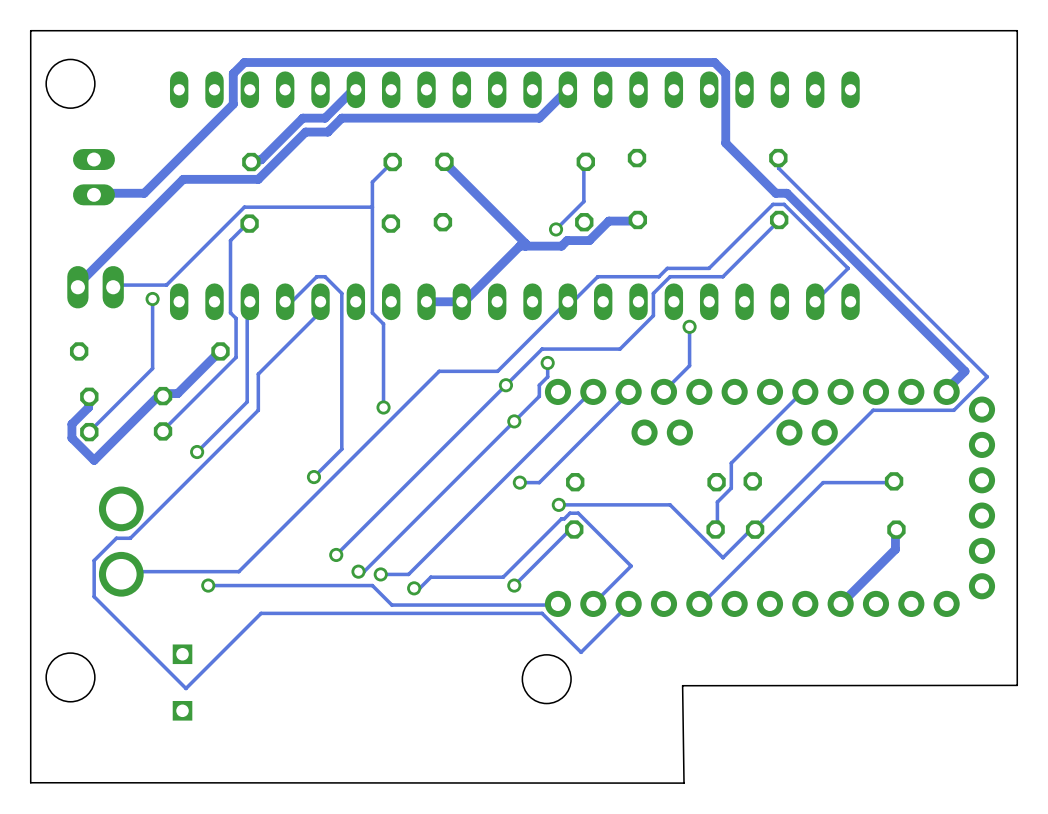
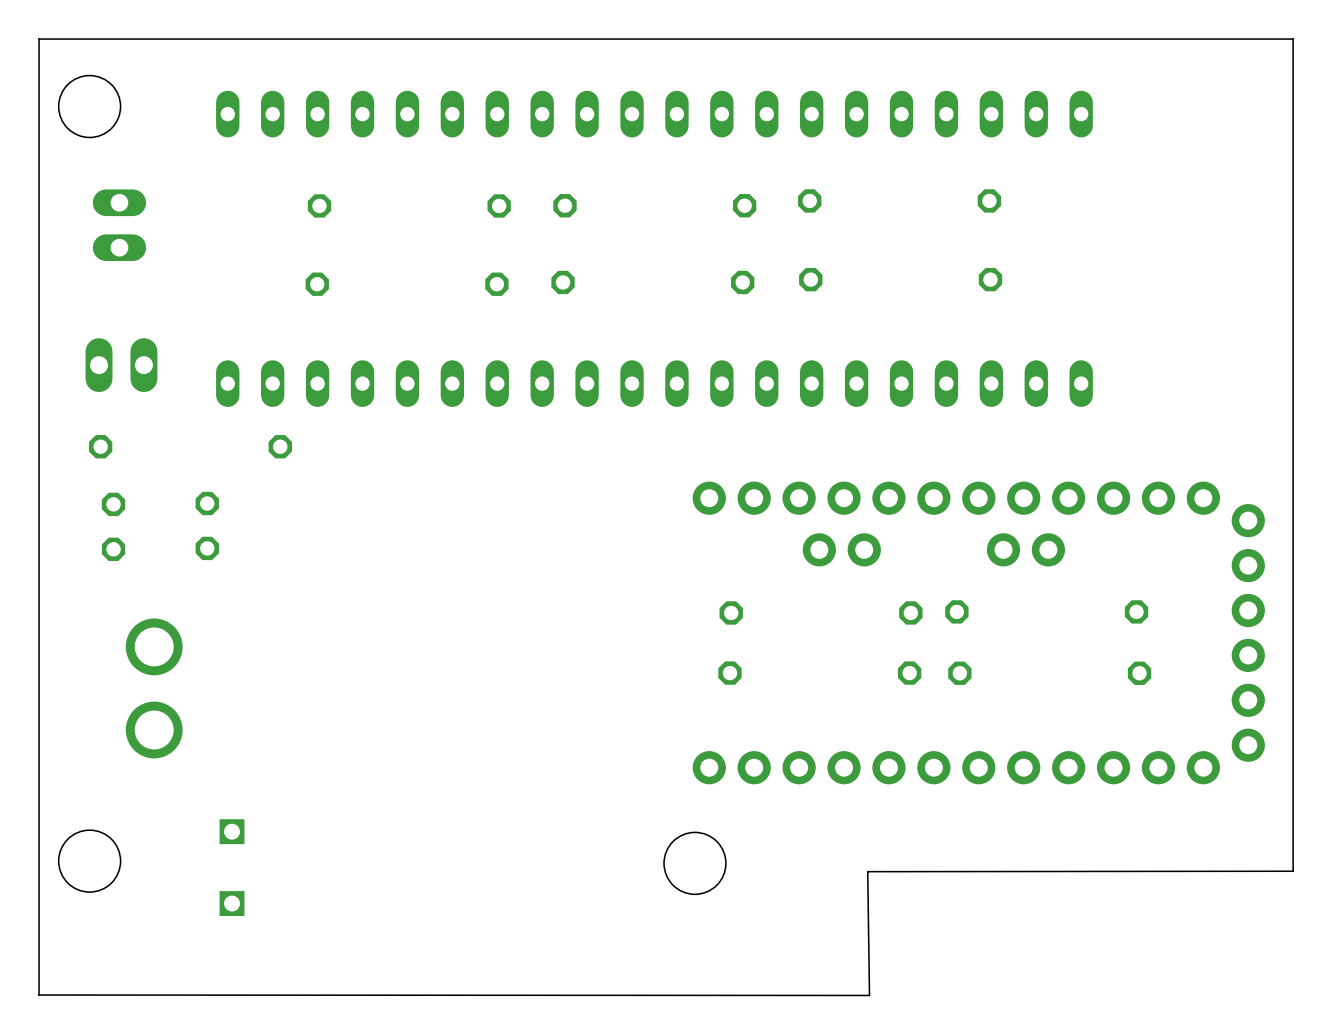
track: (355, 89) (355, 87) (325, 118) (302, 118) (261, 159) (252, 159) (251, 162) -> none
track: (567, 89) (539, 118) (341, 118) (327, 132) (305, 132) (258, 179) (183, 179) (77, 285) (77, 287) -> none
track: (778, 158) (778, 168) (987, 376) (953, 410) (873, 410) (755, 529) (753, 527) (722, 557) (670, 504) (558, 504) -> none
track: (444, 161) (525, 243) (525, 246) -> none
track: (585, 161) (583, 162) (583, 201) (556, 229) -> none
track: (392, 162) (372, 182) (372, 312) (383, 324) (383, 407) -> none
track: (93, 194) (94, 193) (144, 193) (233, 104) (233, 73) (244, 62) (714, 62) (725, 73) (725, 143) (775, 193) (786, 193) (965, 371) (945, 390) (946, 391) -> none
track: (372, 207) (244, 207) (166, 285) (113, 285) (113, 287) -> none
track: (637, 219) (608, 221) (589, 240) (567, 240) (561, 246) (519, 246) (464, 301) (426, 301) -> none
track: (779, 219) (722, 276) (670, 276) (653, 293) (653, 315) (620, 349) (542, 349) (336, 554) -> none
track: (249, 223) (230, 240) (230, 312) (236, 318) (236, 357) (163, 431) -> none
via: (556, 229) -> none
track: (152, 298) (152, 368) (89, 432) -> none
via: (152, 298) -> none
track: (249, 301) (247, 301) (247, 401) (197, 452) -> none
track: (285, 301) (291, 301) (316, 276) (325, 276) (341, 293) (341, 449) (313, 477) -> none
track: (320, 301) (319, 312) (258, 374) (258, 410) (130, 538) (116, 538) (94, 560) (94, 596) (185, 688) (261, 613) (542, 613) (581, 652) (628, 603) -> none
track: (815, 301) (848, 268) (784, 204) (773, 204) (709, 268) (667, 268) (658, 276) (597, 276) (572, 301) (567, 301) (497, 371) (439, 371) (238, 571) (122, 571) (121, 574) -> none
track: (689, 326) (689, 365) (663, 391) -> none
via: (689, 326) -> none
track: (220, 351) (177, 393) (163, 393) (163, 396) (160, 393) (94, 460) (71, 438) (71, 424) (88, 407) (89, 396) -> none
track: (547, 362) (547, 376) (539, 385) (539, 396) (364, 571) (358, 571) -> none
via: (547, 362) -> none
via: (505, 385) -> none
track: (593, 391) (592, 390) (408, 574) (380, 574) -> none
track: (628, 391) (539, 482) (519, 482) -> none
track: (805, 391) (803, 390) (731, 463) (731, 488) (717, 502) (717, 527) (715, 529) -> none
via: (383, 407) -> none
via: (514, 421) -> none
via: (197, 452) -> none
via: (313, 477) -> none
track: (894, 481) (823, 482) (700, 605) (699, 603) -> none
via: (519, 482) -> none
via: (558, 504) -> none
track: (574, 529) (569, 529) (514, 585) -> none
track: (896, 529) (895, 549) (840, 603) -> none
via: (336, 554) -> none
via: (358, 571) -> none
via: (380, 574) -> none
track: (208, 585) (372, 585) (391, 605) (557, 603) -> none
via: (208, 585) -> none
via: (514, 585) -> none
track: (414, 588) (419, 588) (430, 577) (503, 577) (561, 518) (564, 518) (569, 513) (578, 513) (631, 566) (593, 603) -> none
via: (414, 588) -> none

